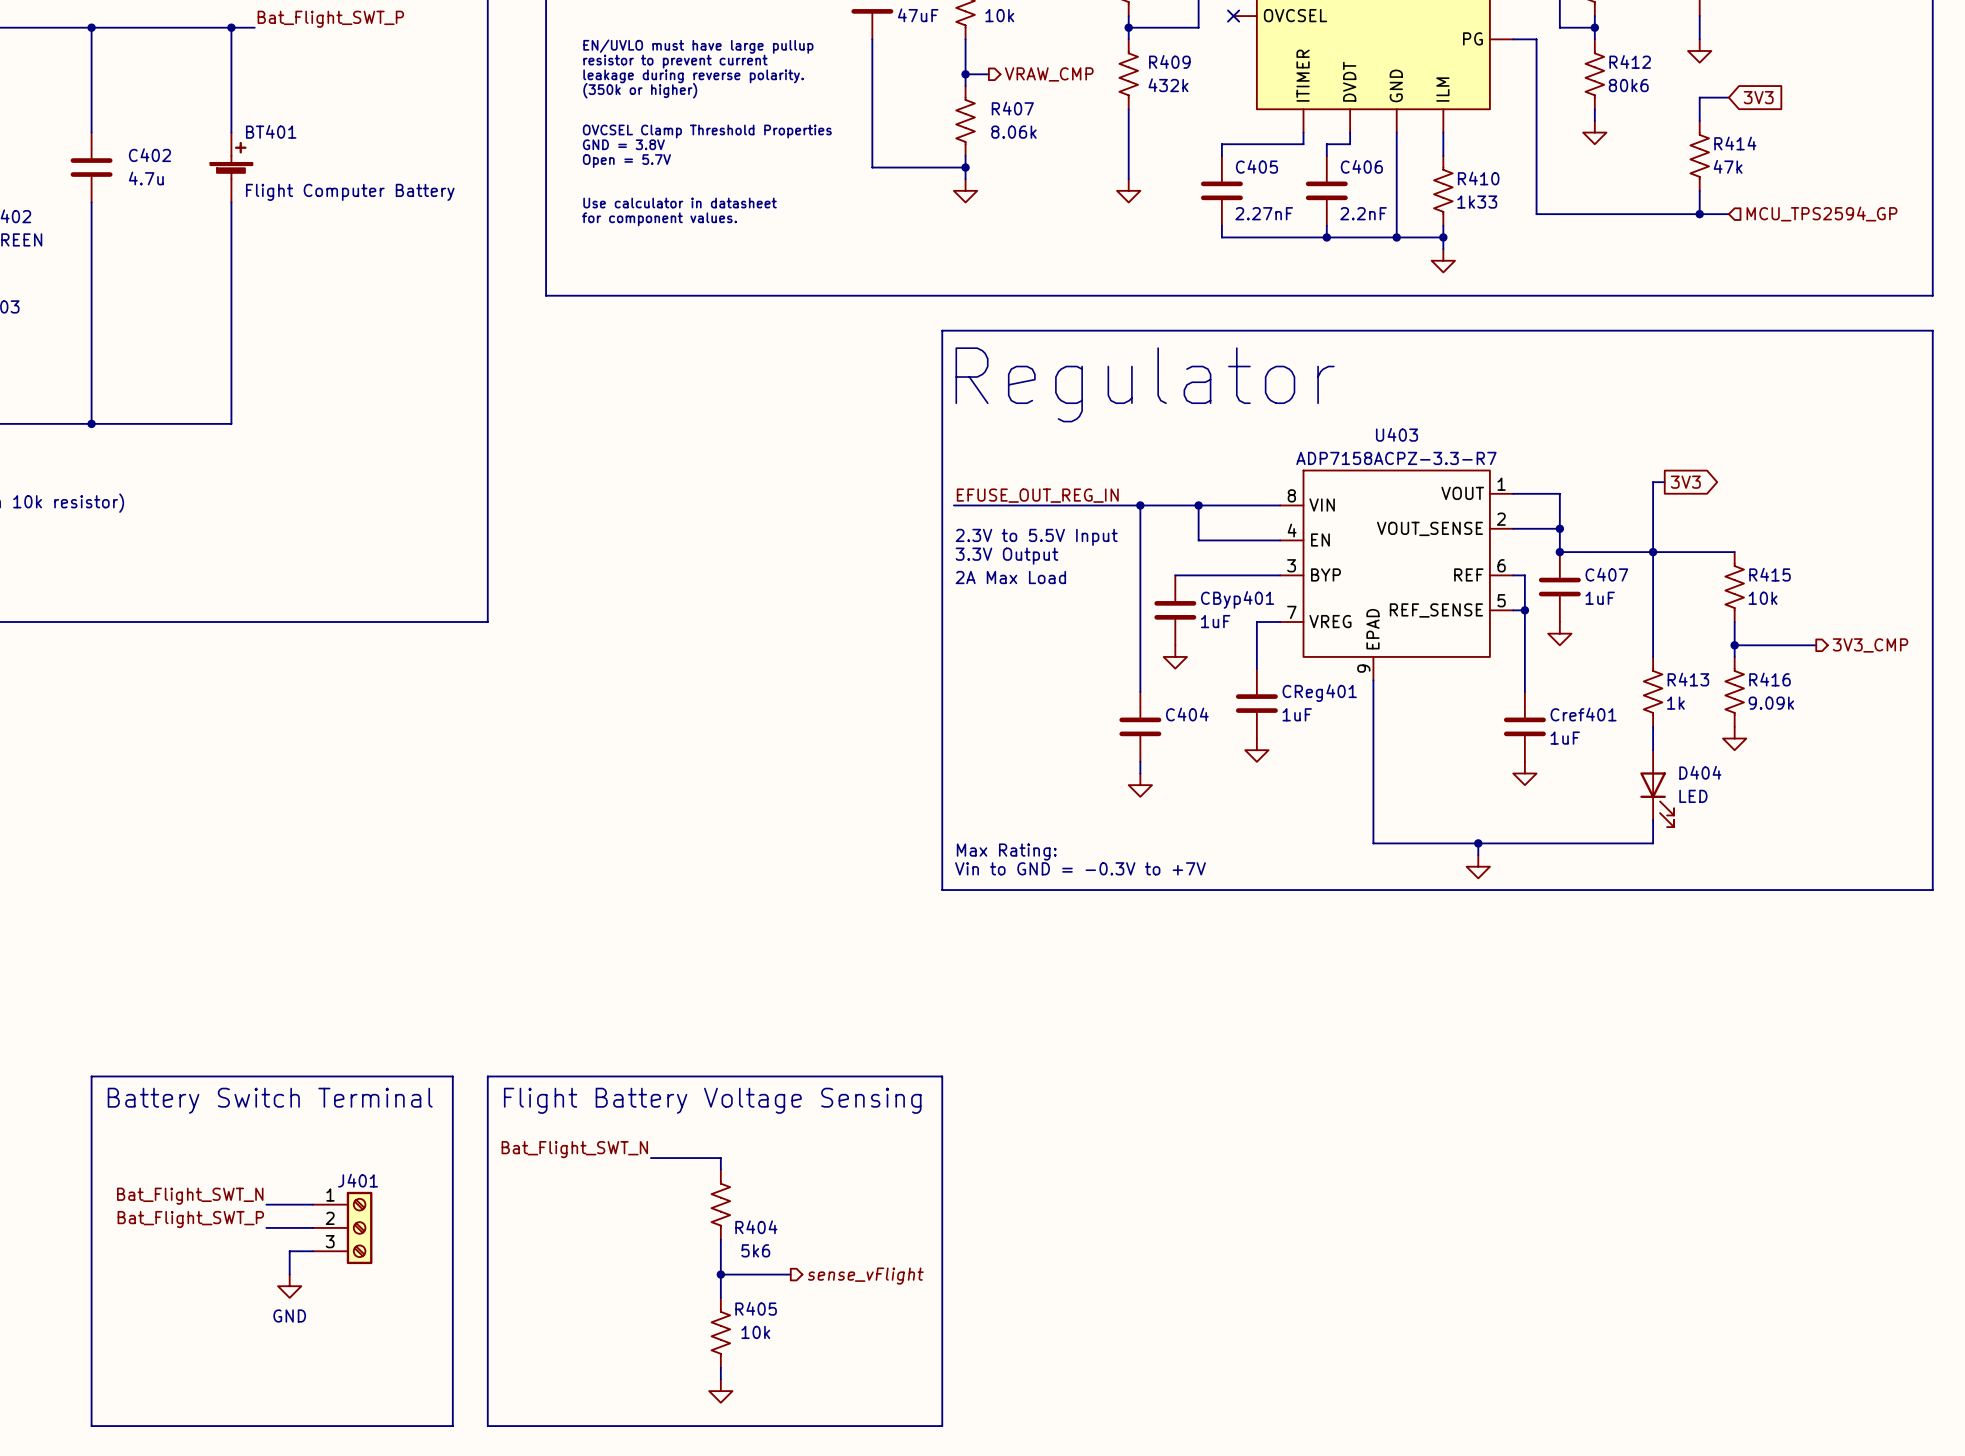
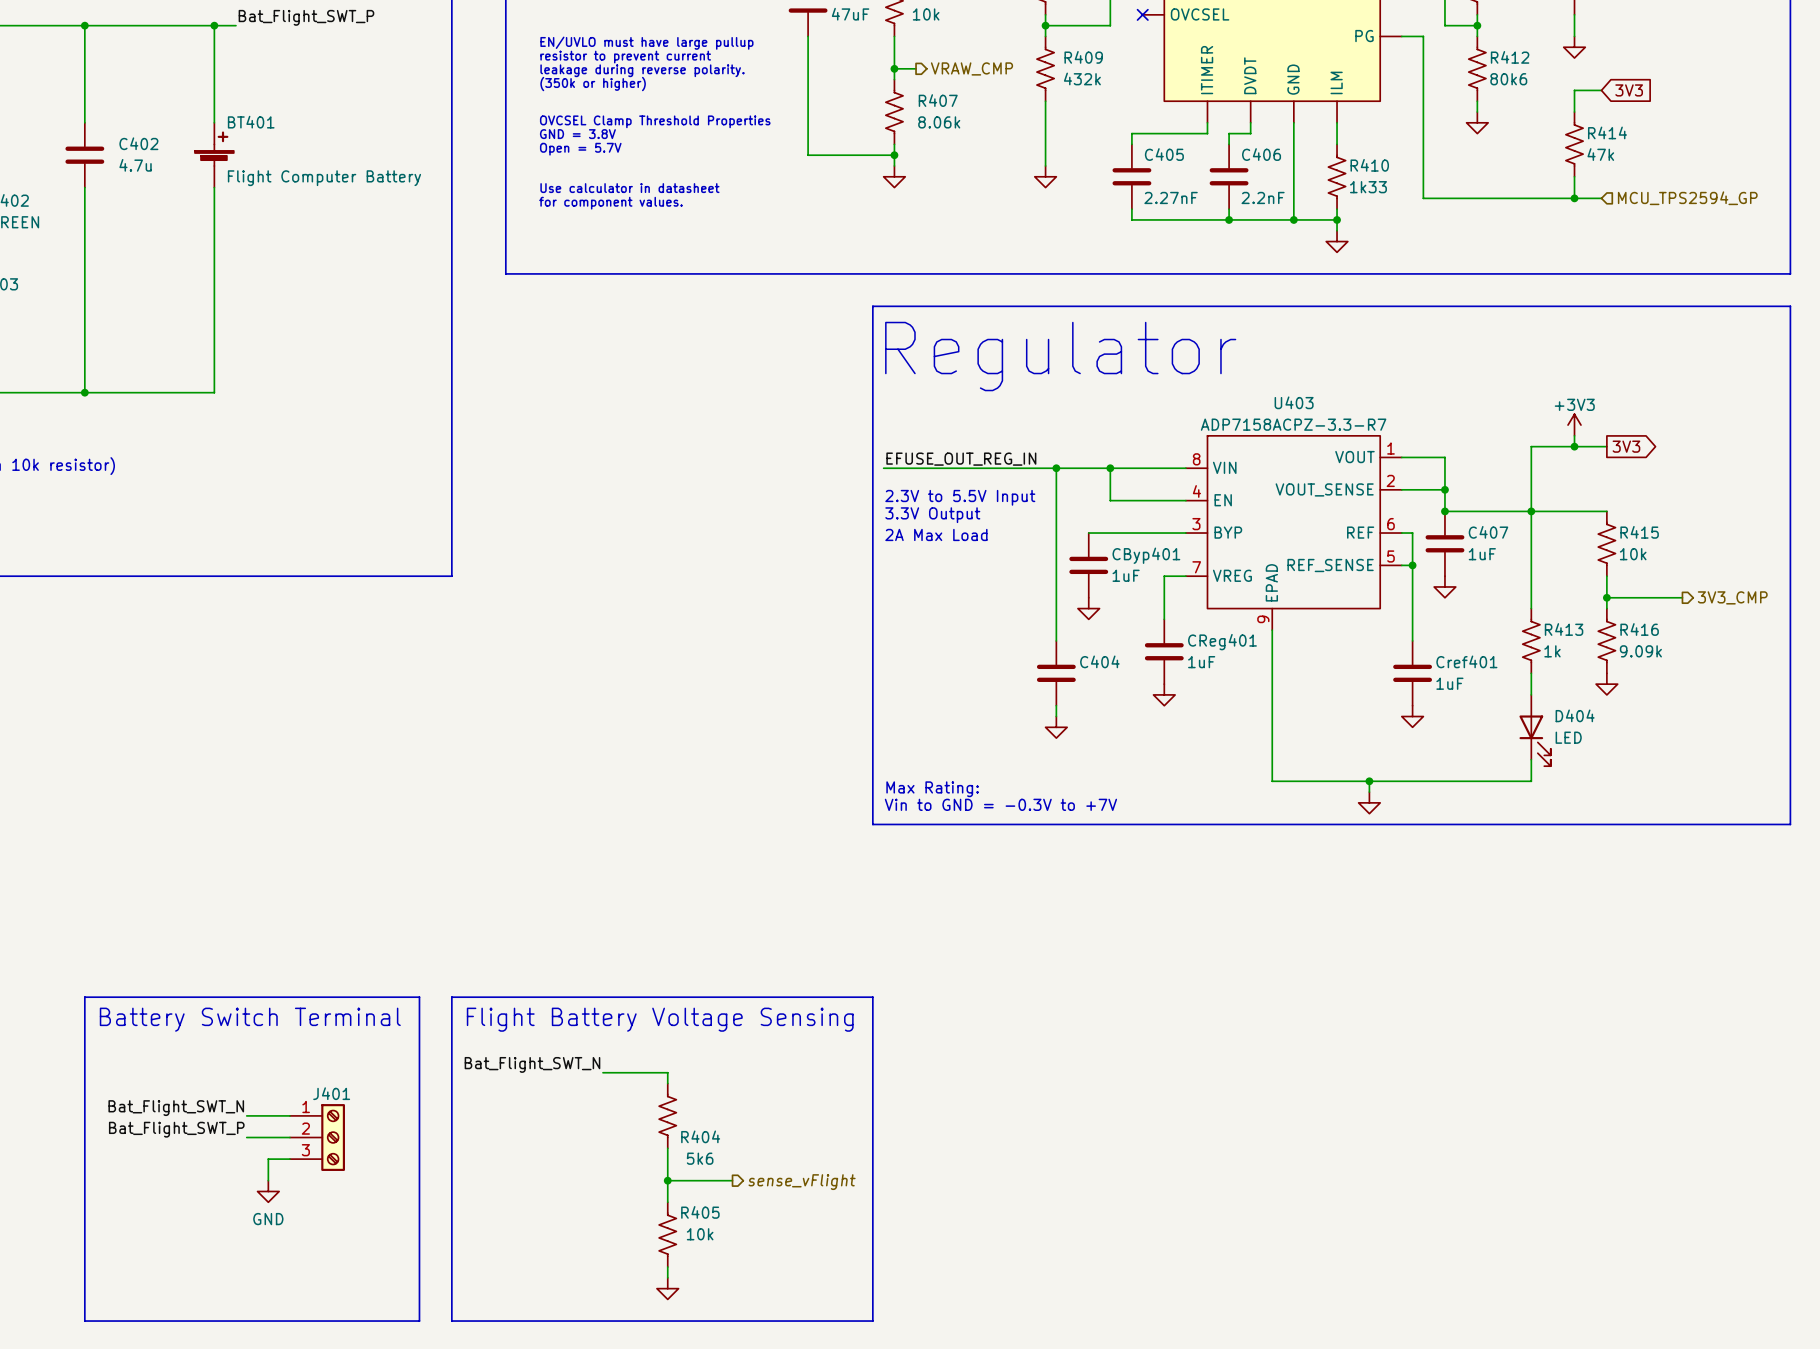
power symbol: none -> +3V3 (1574, 425)
wire: none -> (1574, 435) (1574, 446)
wire: none -> (1542, 446) (1606, 446)
global label position: 3V3 (1685, 482) -> 3V3 (1626, 446)
junction: none -> (1574, 446)

